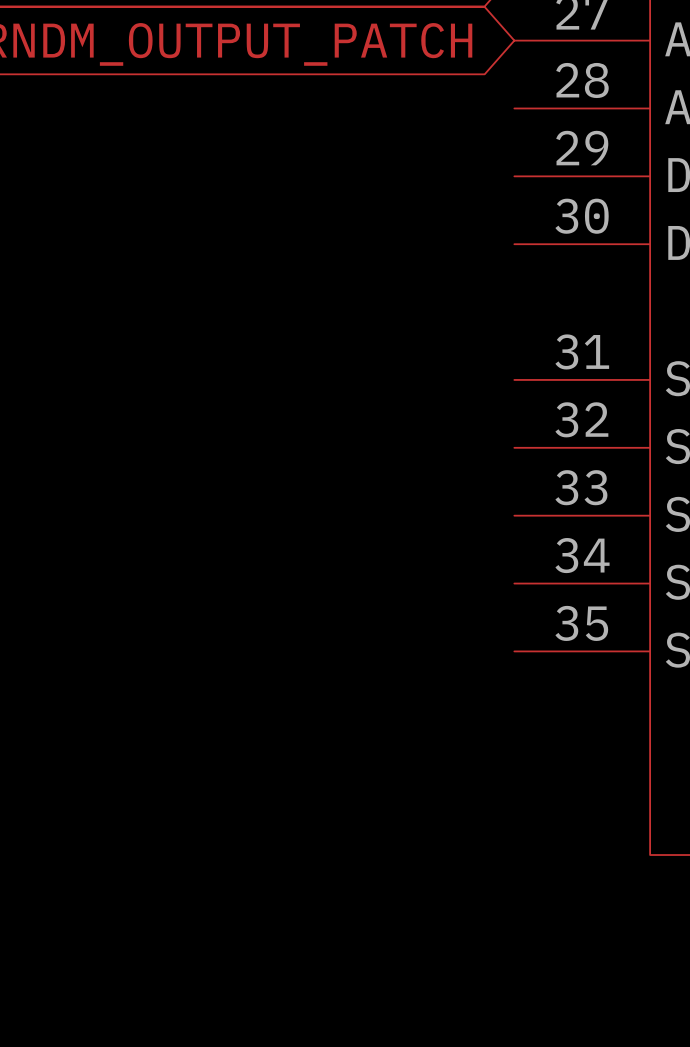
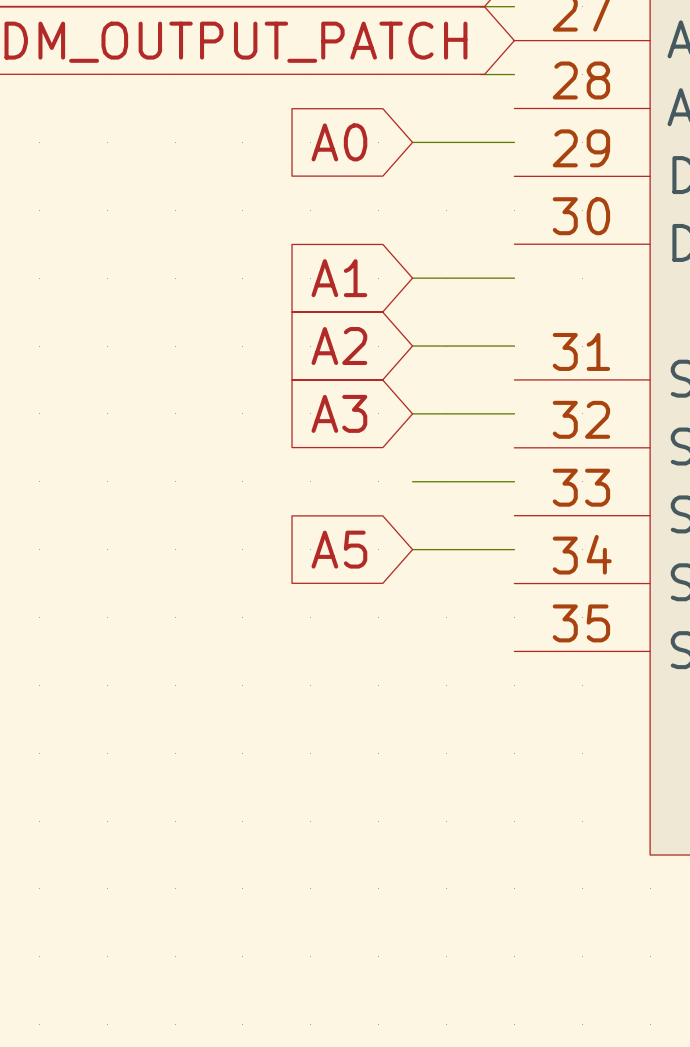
wire: none -> (480, 6) (514, 6)
wire: none -> (480, 74) (514, 74)
global label: none -> A0 (339, 142)
wire: none -> (412, 142) (514, 142)
global label: none -> A1 (339, 278)
wire: none -> (412, 278) (514, 278)
global label: none -> A2 (339, 346)
wire: none -> (412, 346) (514, 346)
global label: none -> A3 (339, 413)
wire: none -> (412, 413) (514, 413)
wire: none -> (412, 481) (514, 481)
global label: none -> A5 (339, 549)
wire: none -> (412, 549) (514, 549)

